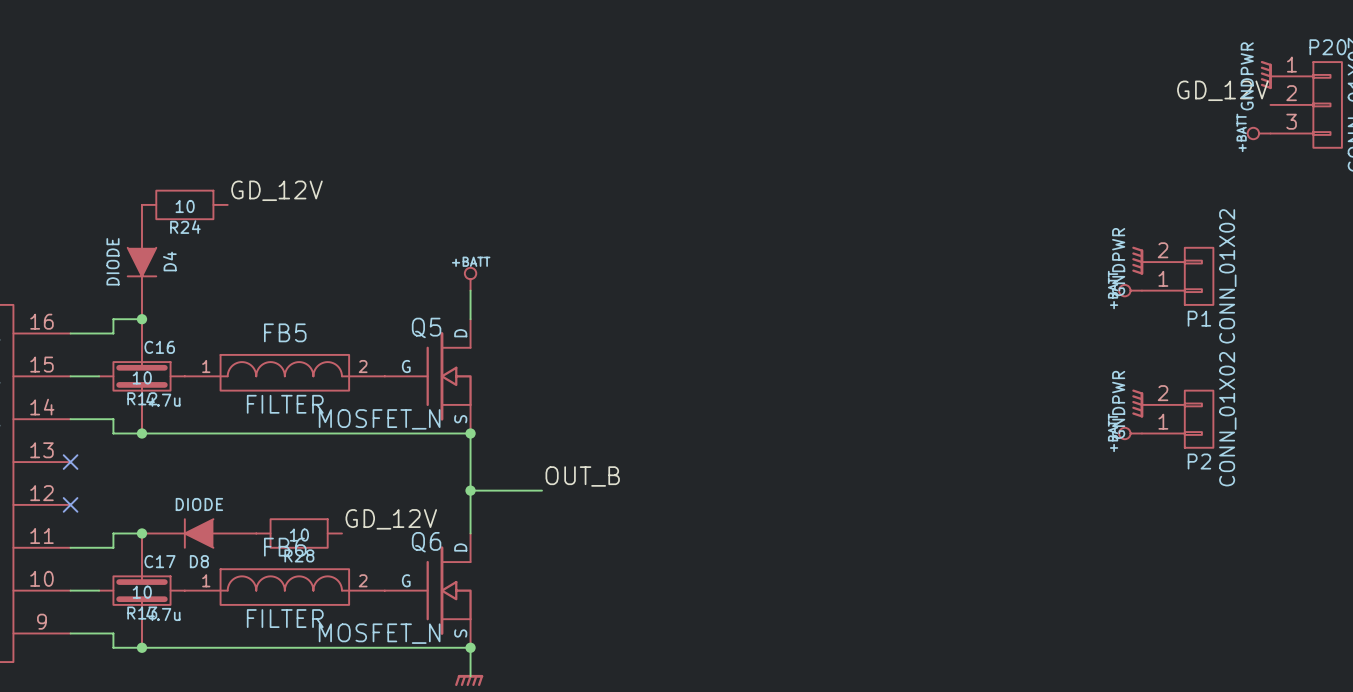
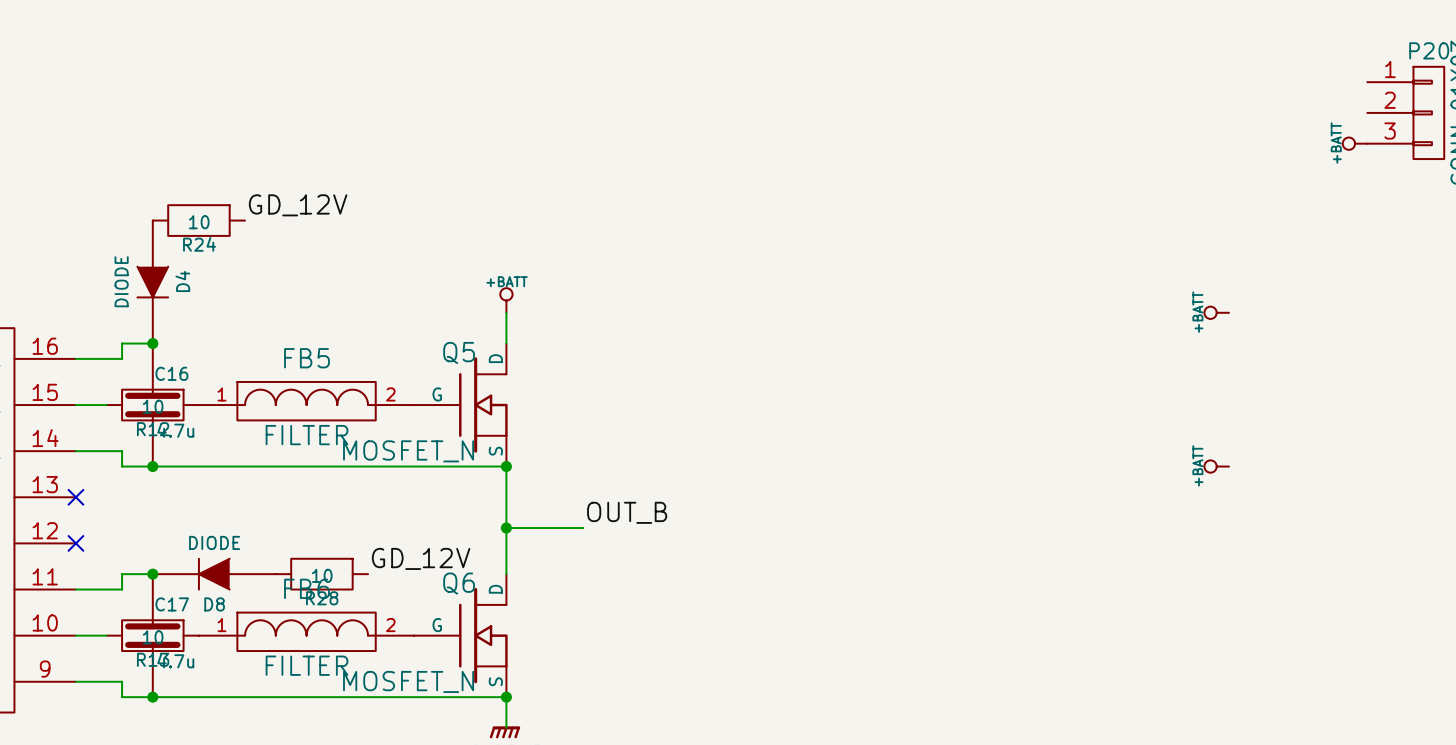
power symbol: GNDPWR (1266, 75) -> none
label: GD_12V (1222, 90) -> none
power symbol: GNDPWR (1137, 260) -> none
P1: CONN_01X02 (1177, 276) -> none
power symbol: GNDPWR (1137, 403) -> none
P2: CONN_01X02 (1177, 419) -> none

